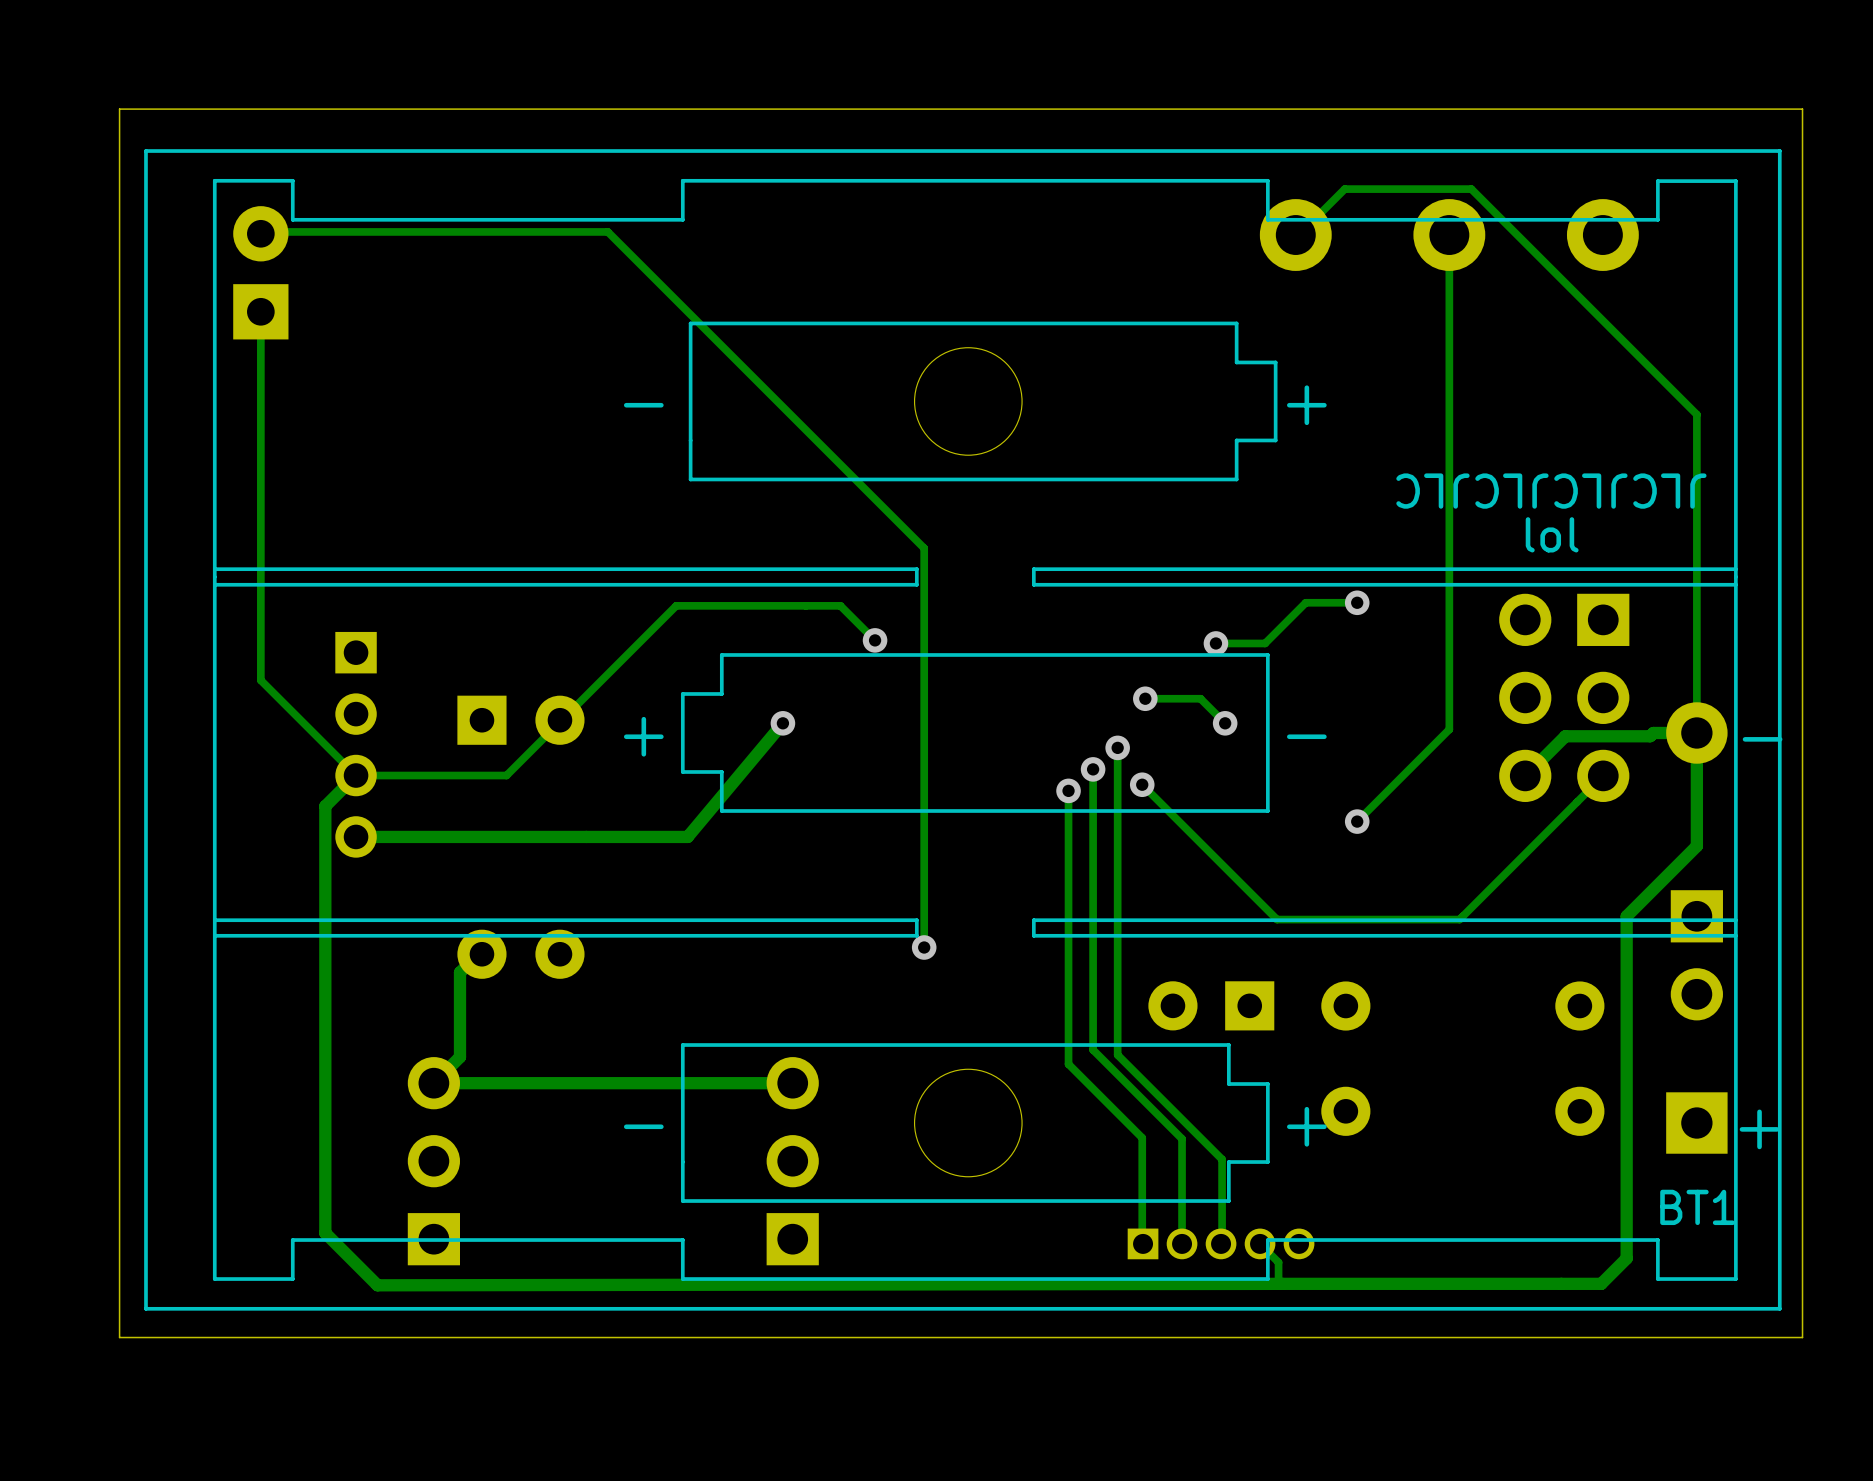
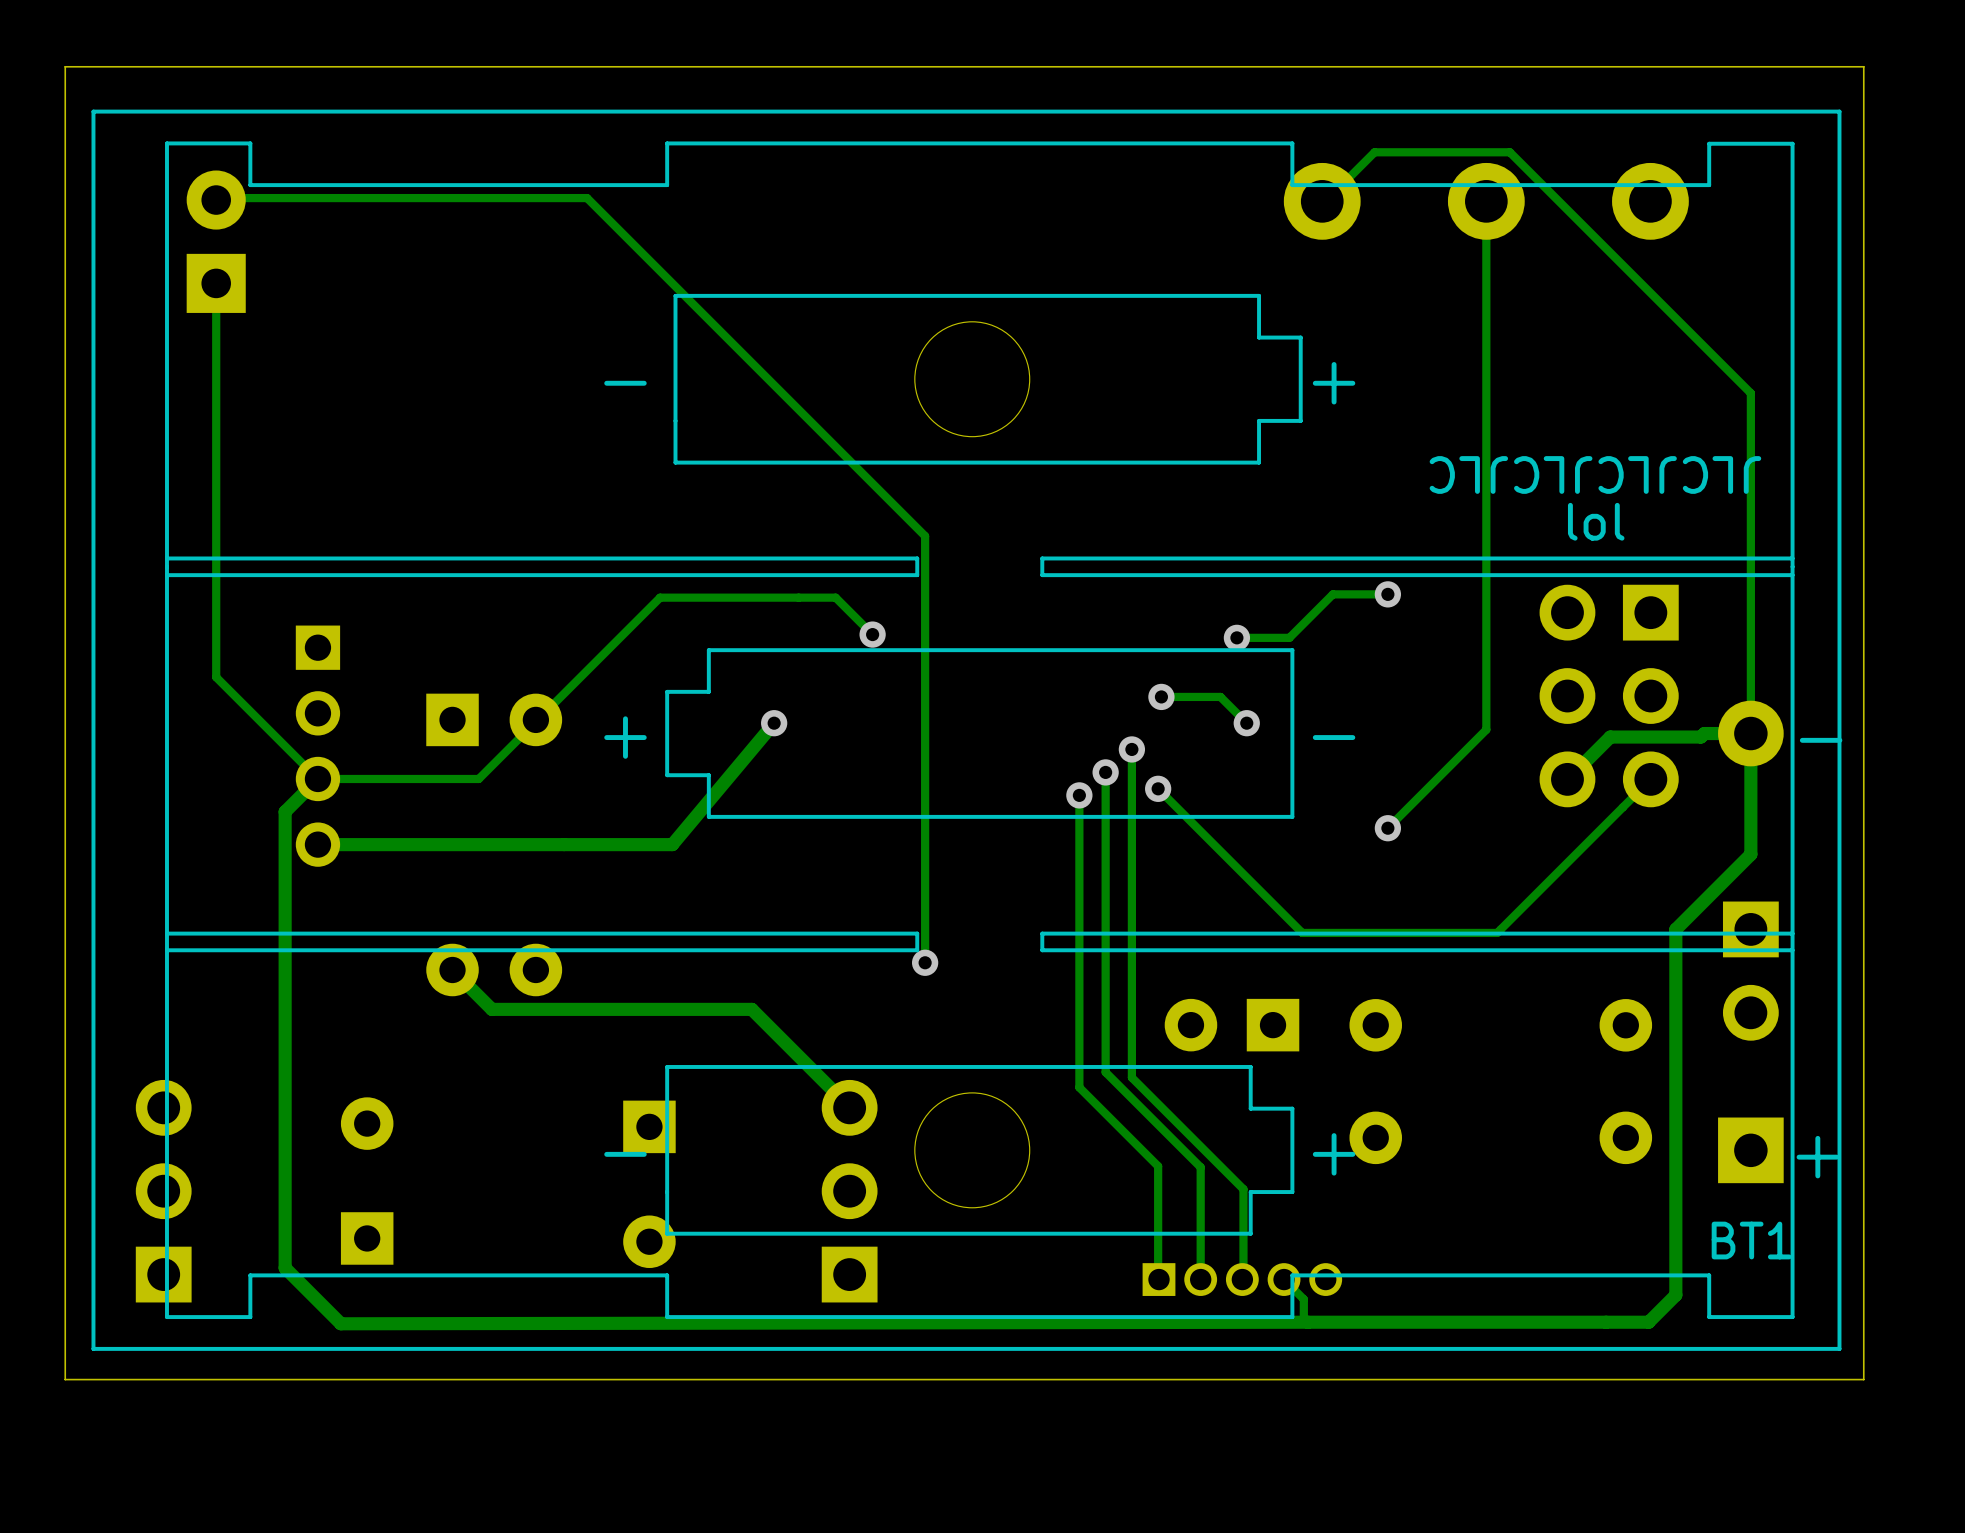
track: (478, 953) (460, 972) (460, 1057) (433, 1083) (791, 1083) -> none
track: none -> (452, 969) (491, 1009) (751, 1009) (849, 1107)
part: none -> (367, 1181)
part: none -> (649, 1184)
part: none -> (163, 1191)
part: (433, 1161) -> none
part position: (792, 1161) -> (849, 1191)

